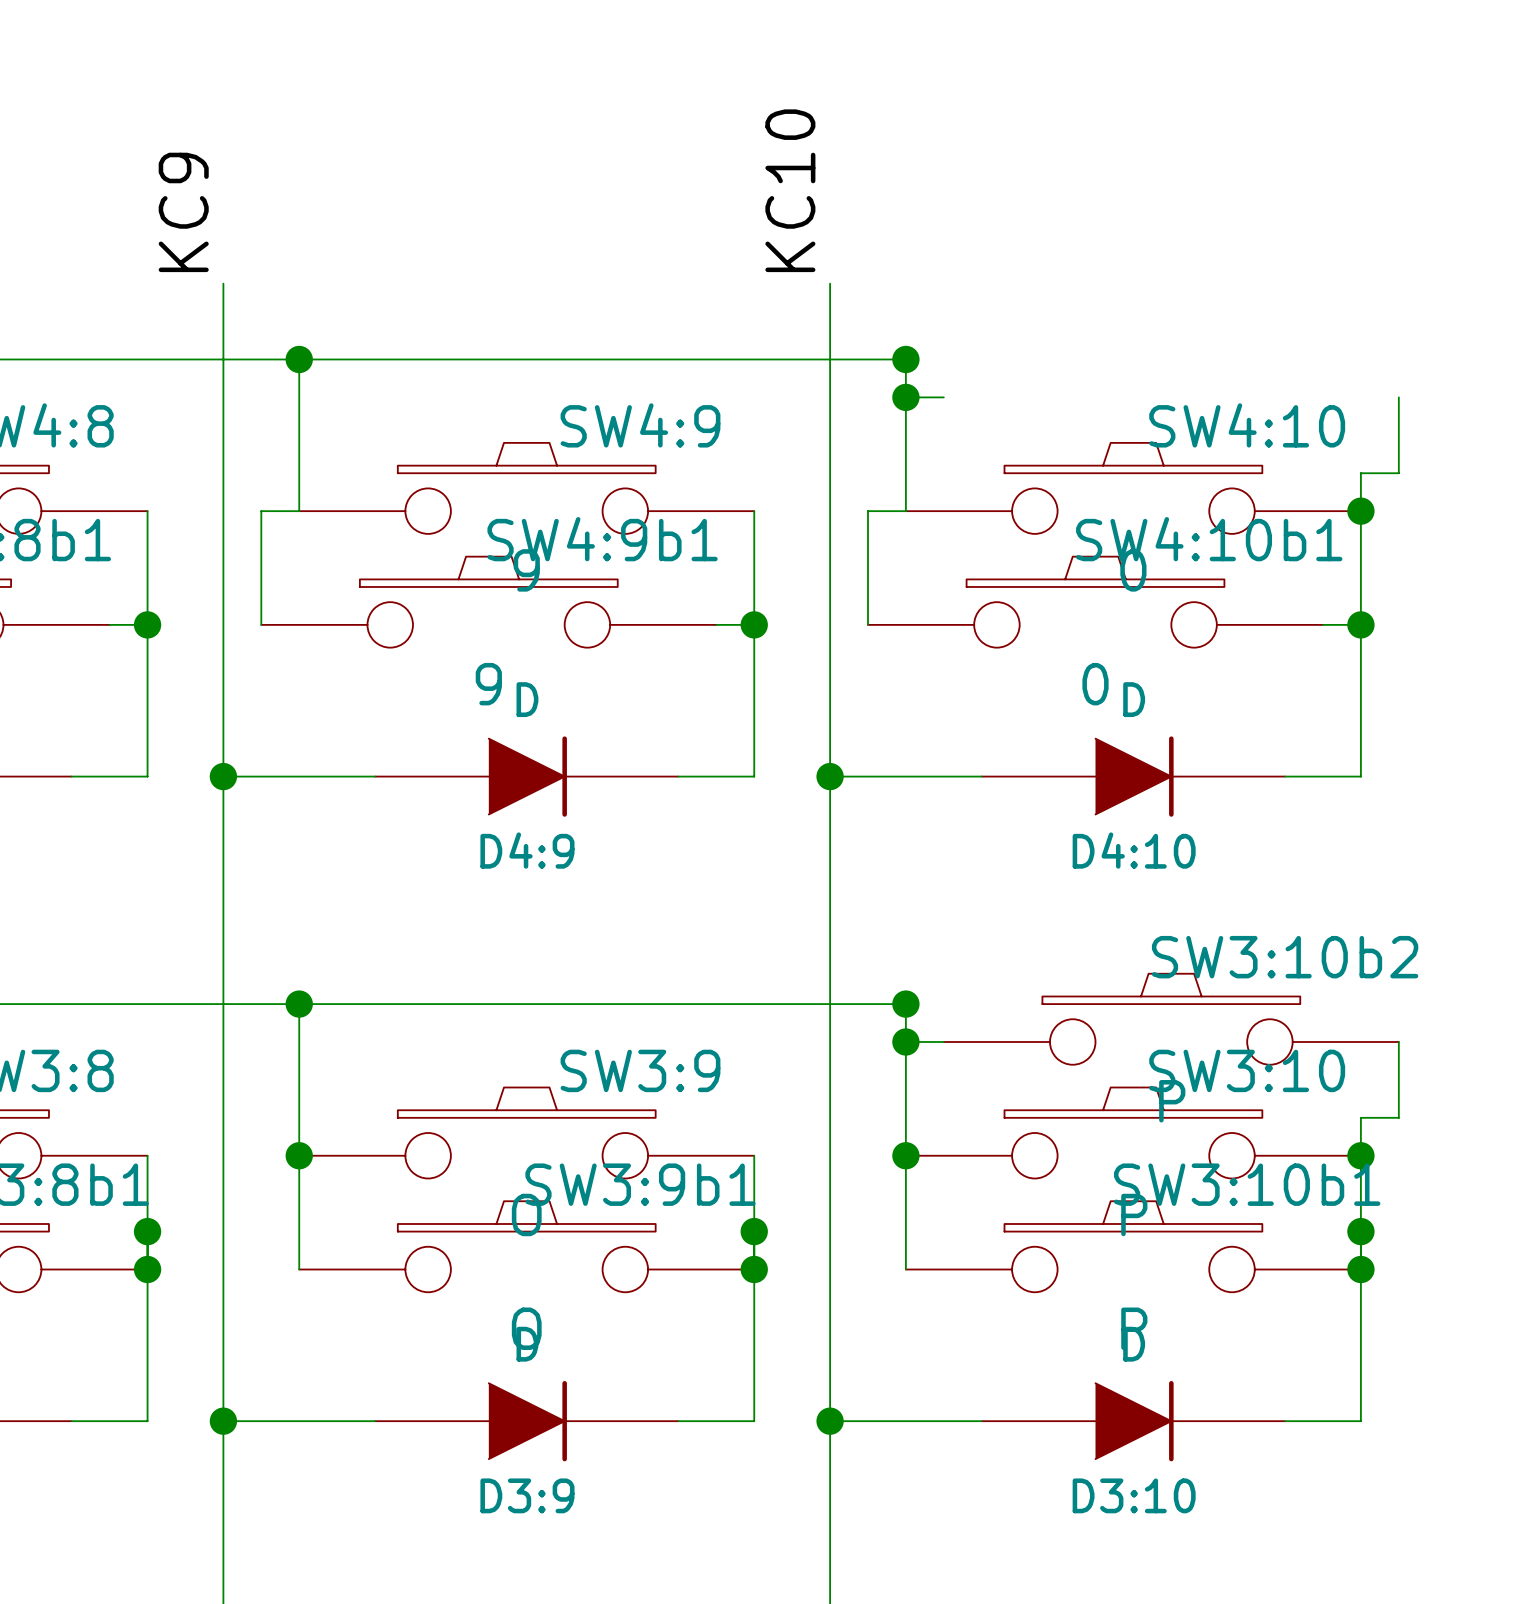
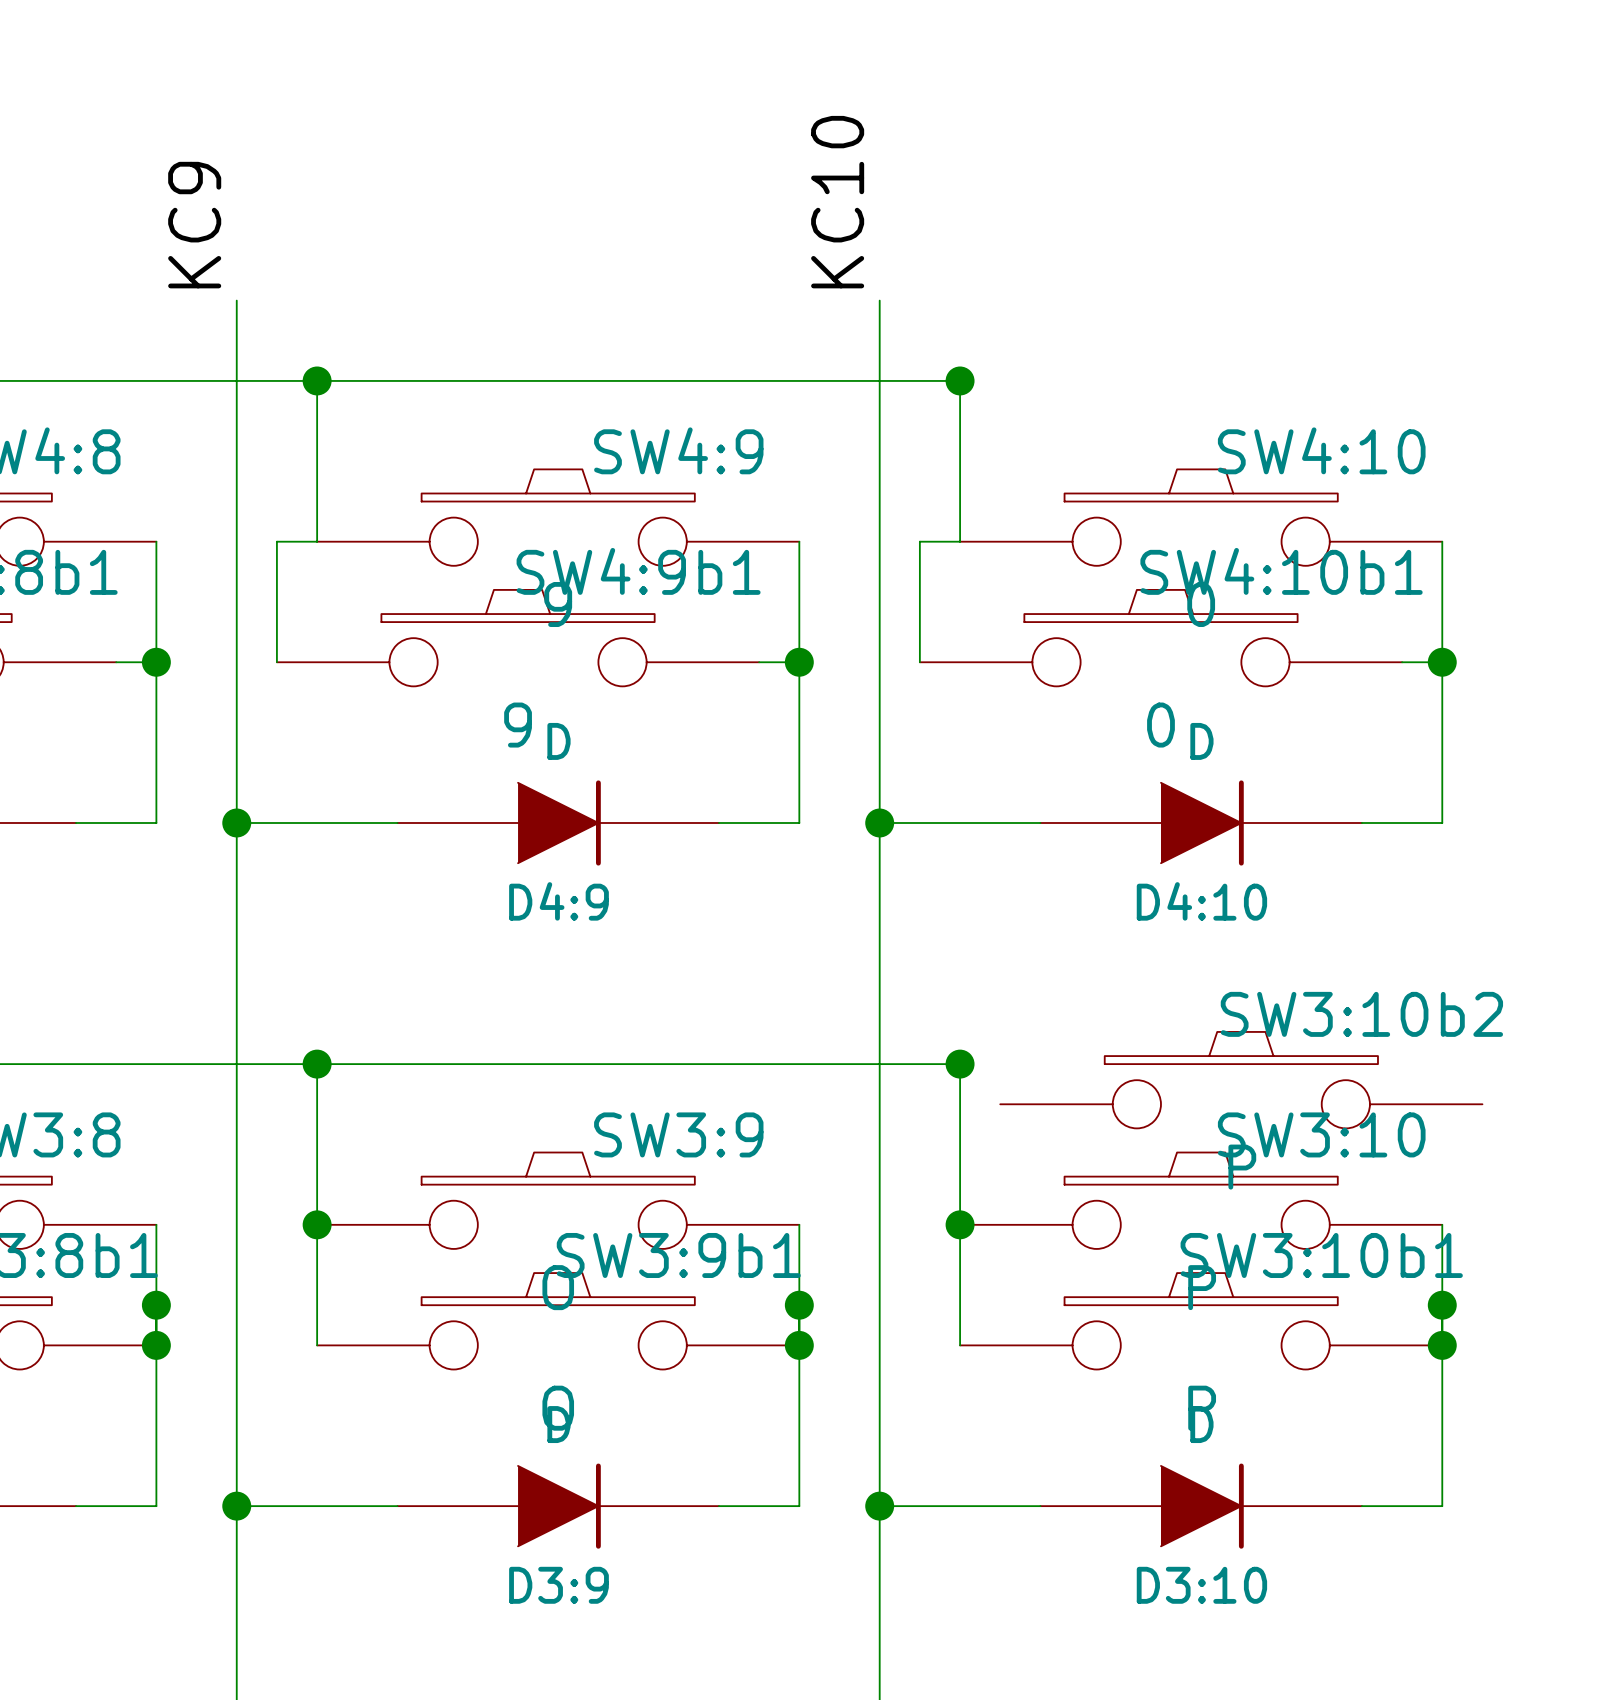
wire: (905, 397) (943, 397) -> none
junction: (905, 397) -> none
wire: (1398, 397) (1398, 473) (1360, 473) (1360, 511) -> none
junction: (1360, 511) -> none
wire: (905, 1041) (943, 1041) -> none
junction: (905, 1041) -> none
wire: (1398, 1041) (1398, 1117) (1360, 1117) (1360, 1155) -> none
junction: (1360, 1155) -> none

